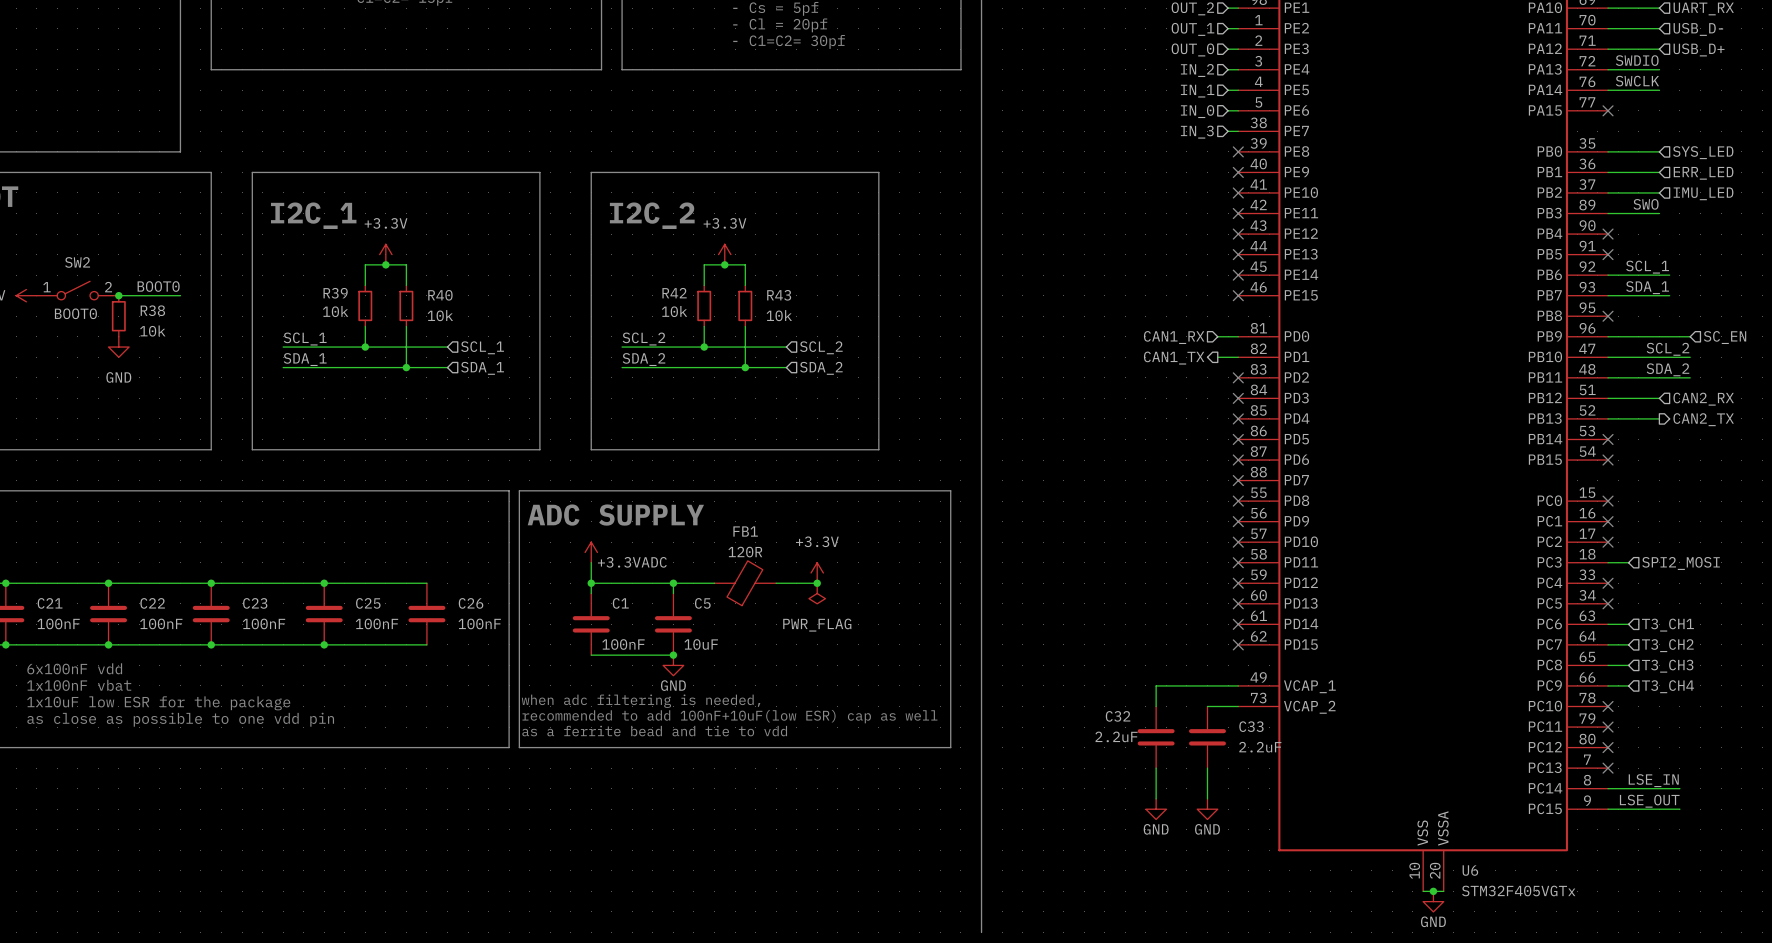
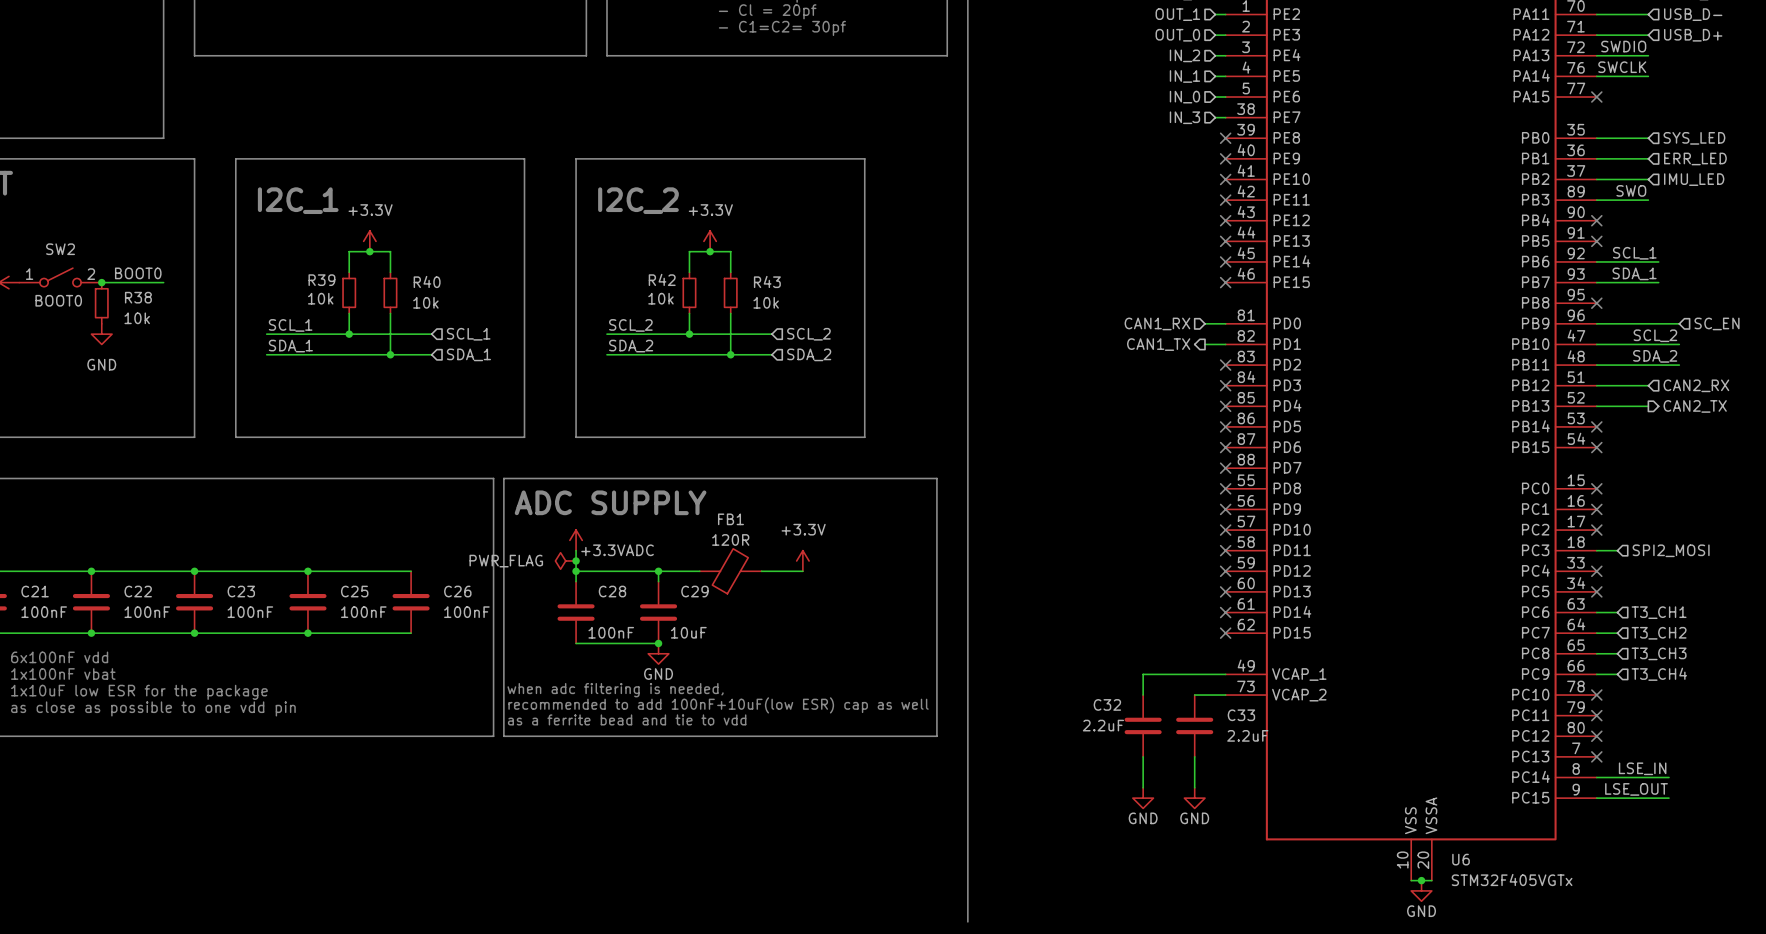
power symbol: none -> PWR_FLAG (565, 560)
junction: none -> (576, 560)
junction: (817, 583) -> none
power symbol: PWR_FLAG (817, 593) -> none
C1 name: C1 (620, 603) -> C28 (612, 591)
C5 name: C5 (702, 603) -> C29 (694, 591)

